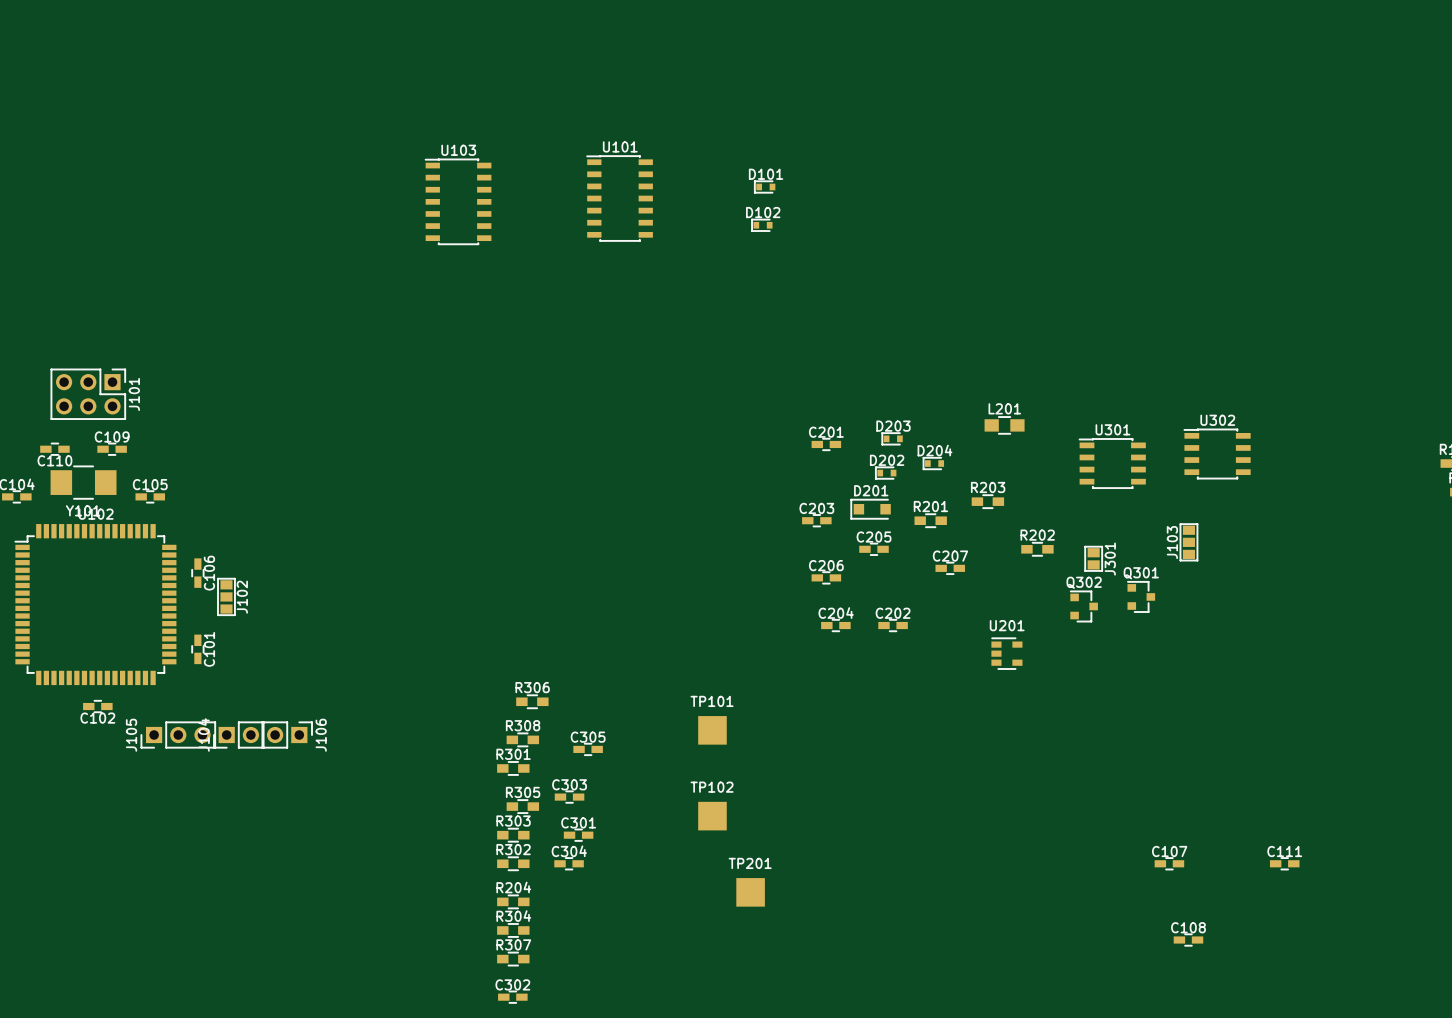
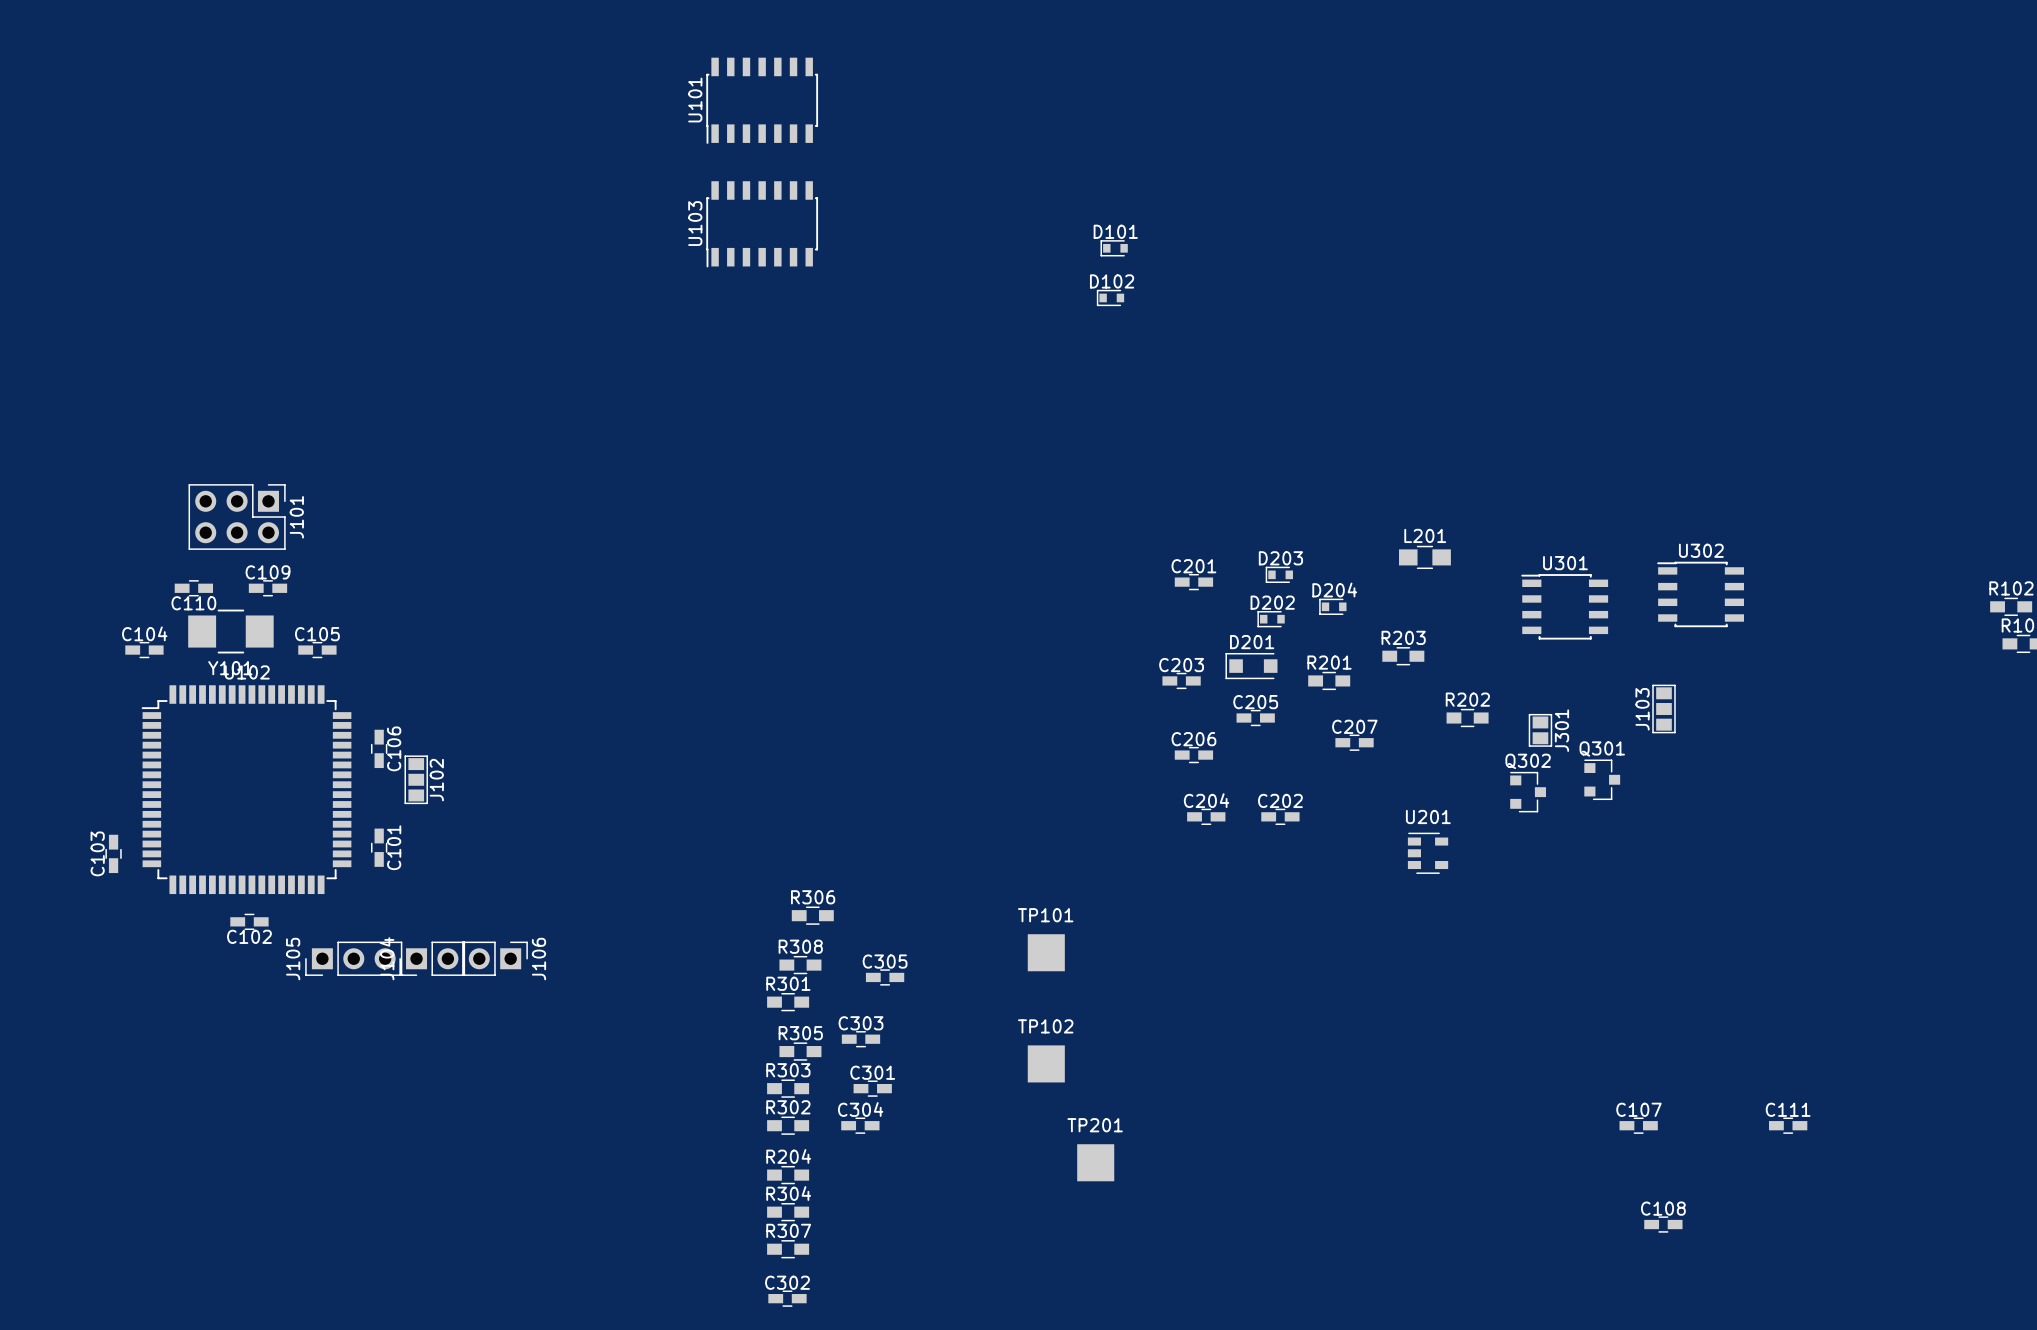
U101 rotation: 0° (619, 198) -> 90° counterclockwise (762, 100)
U101 position: (619, 198) -> (762, 100)
U103 rotation: 0° (458, 201) -> 90° counterclockwise (762, 224)

